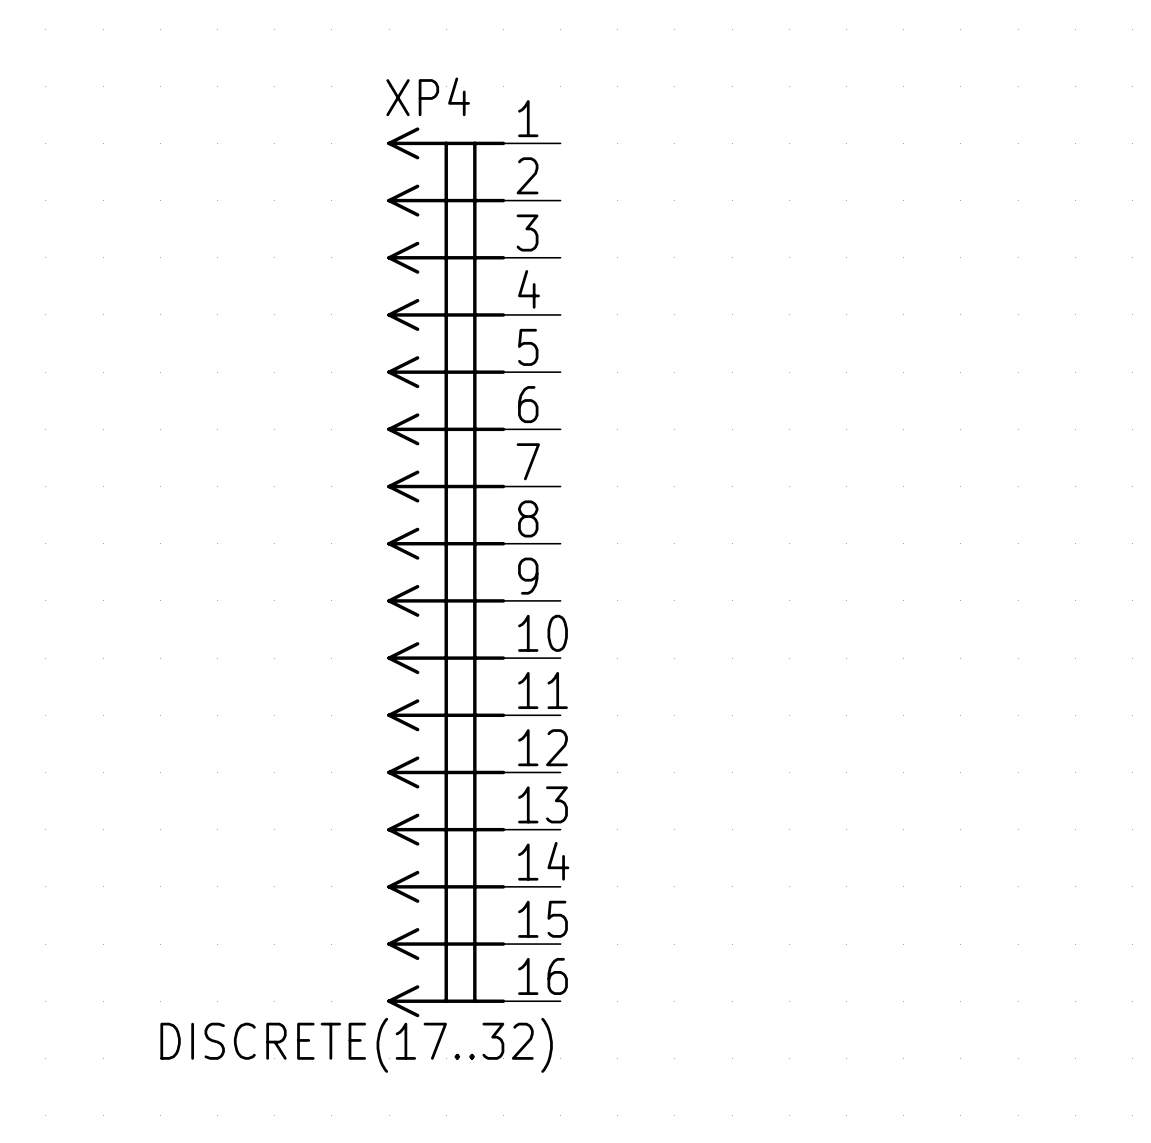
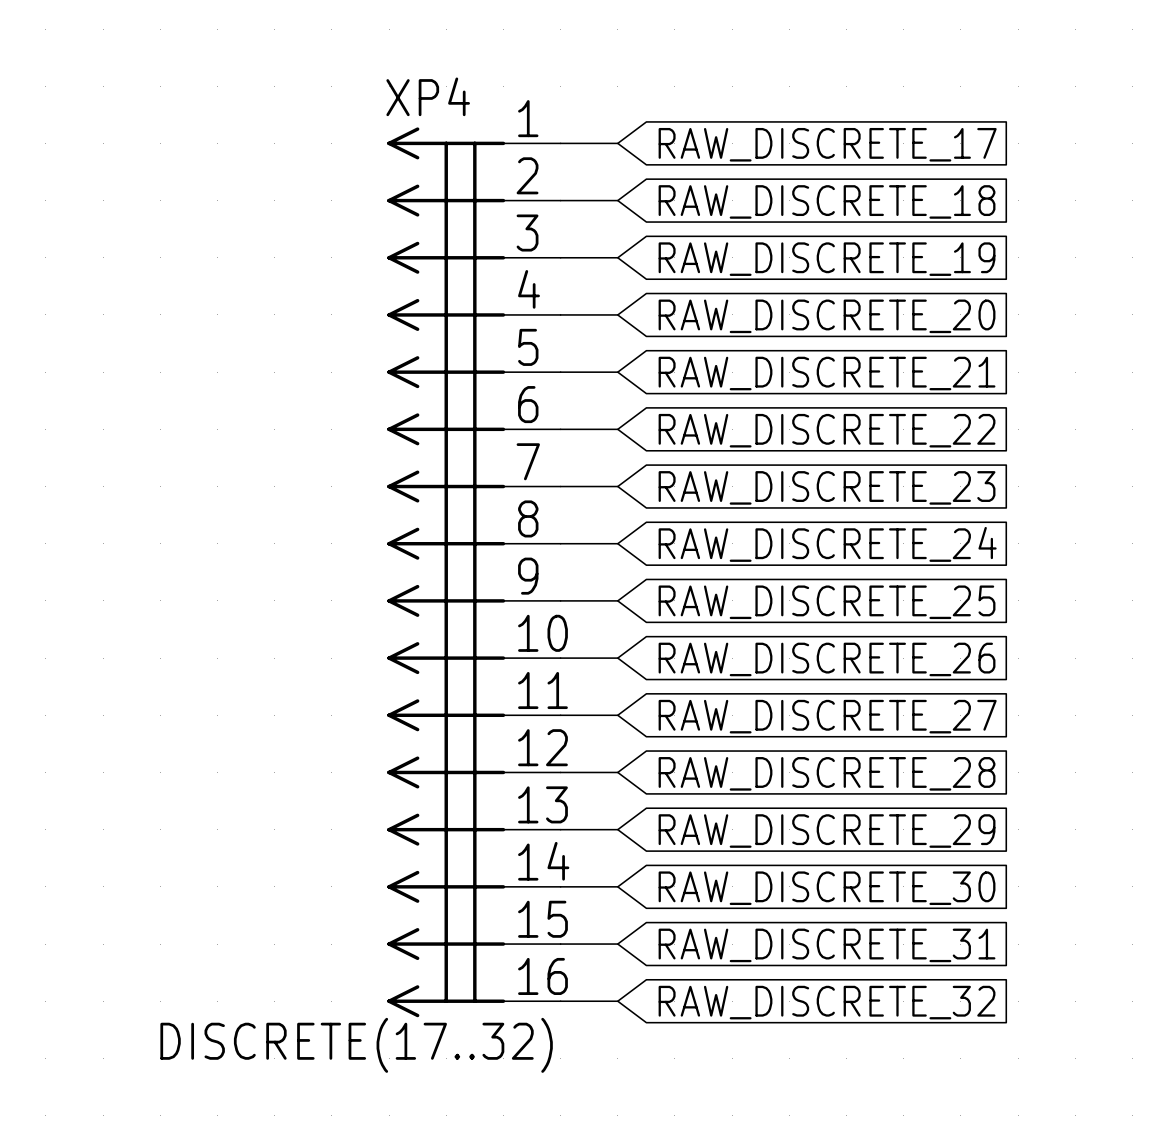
wire: none -> (560, 143) (617, 143)
global label: none -> RAW_DISCRETE_17 (827, 144)
wire: none -> (560, 200) (617, 200)
global label: none -> RAW_DISCRETE_18 (827, 201)
wire: none -> (560, 257) (617, 257)
global label: none -> RAW_DISCRETE_19 (827, 259)
wire: none -> (560, 314) (617, 314)
global label: none -> RAW_DISCRETE_20 (827, 316)
wire: none -> (560, 372) (617, 372)
global label: none -> RAW_DISCRETE_21 (827, 373)
wire: none -> (560, 429) (617, 429)
global label: none -> RAW_DISCRETE_22 (827, 430)
wire: none -> (560, 486) (617, 486)
global label: none -> RAW_DISCRETE_23 (827, 487)
wire: none -> (560, 543) (617, 543)
global label: none -> RAW_DISCRETE_24 (827, 544)
wire: none -> (560, 600) (617, 600)
global label: none -> RAW_DISCRETE_25 (827, 602)
wire: none -> (560, 658) (617, 658)
global label: none -> RAW_DISCRETE_26 (827, 659)
wire: none -> (560, 715) (617, 715)
global label: none -> RAW_DISCRETE_27 (827, 716)
wire: none -> (560, 772) (617, 772)
global label: none -> RAW_DISCRETE_28 (827, 773)
wire: none -> (560, 829) (617, 829)
global label: none -> RAW_DISCRETE_29 (827, 831)
wire: none -> (560, 886) (617, 886)
global label: none -> RAW_DISCRETE_30 (827, 888)
wire: none -> (560, 944) (617, 944)
global label: none -> RAW_DISCRETE_31 (827, 945)
wire: none -> (560, 1001) (617, 1001)
global label: none -> RAW_DISCRETE_32 (827, 1002)

